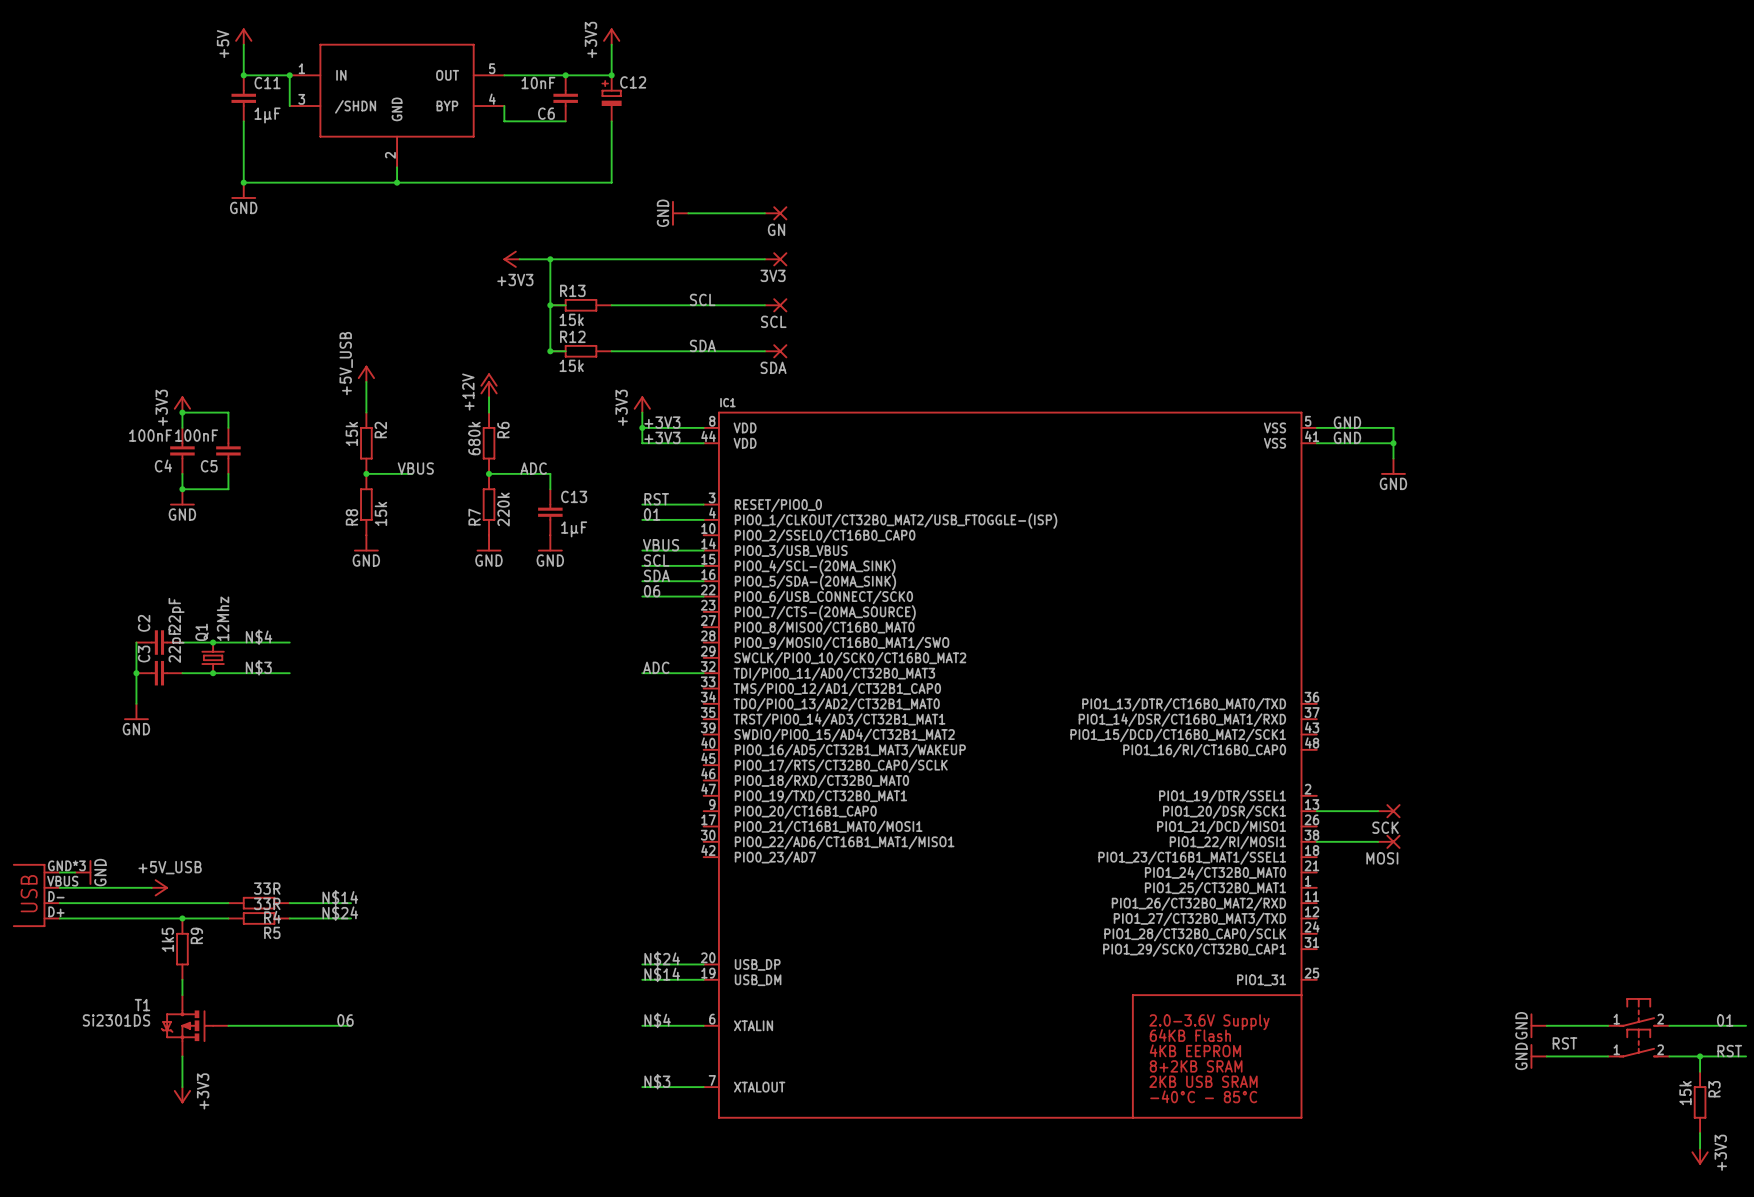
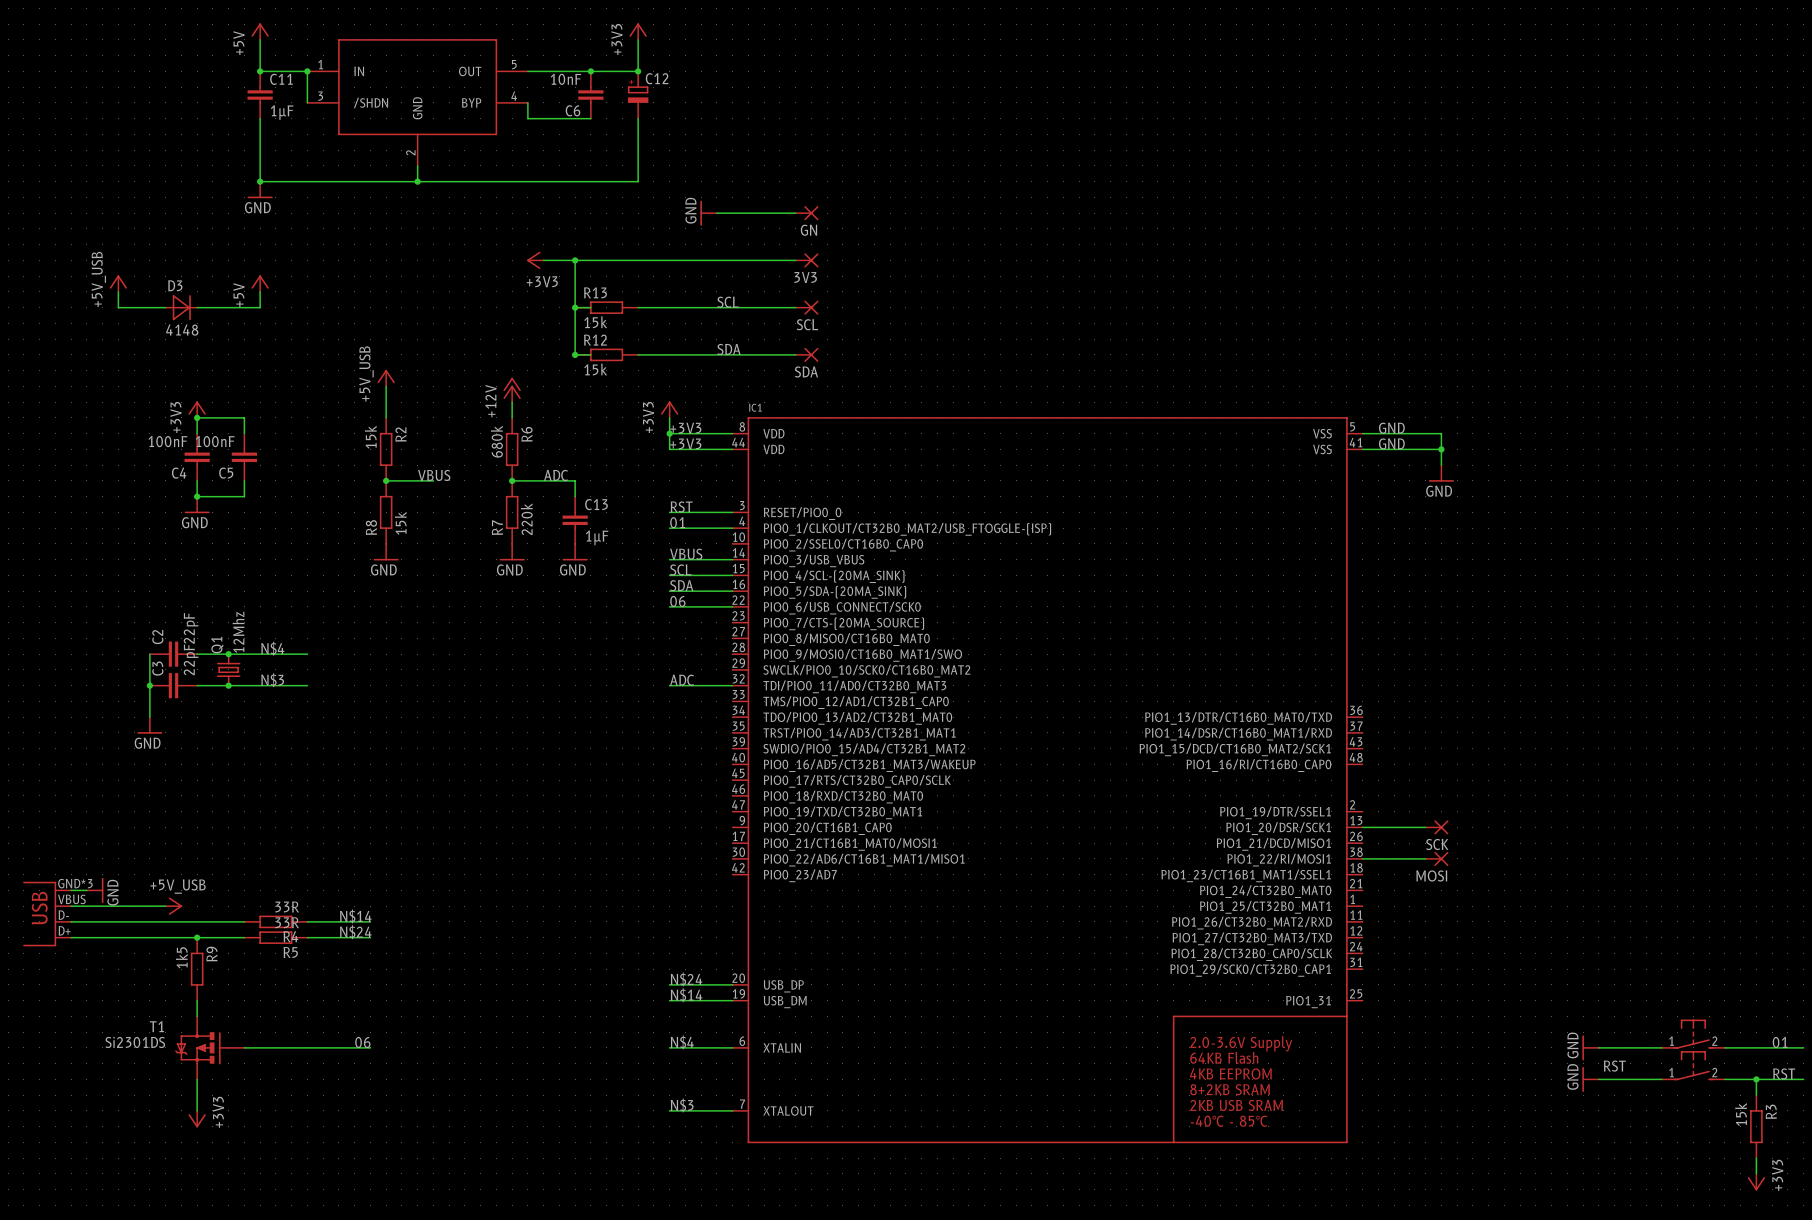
power symbol: none -> +5V_USB (118, 283)
power symbol: none -> +5V (260, 283)
wire: none -> (118, 291) (118, 307) (165, 307)
wire: none -> (260, 291) (260, 307) (197, 307)
D3: none -> 4148 (181, 307)

